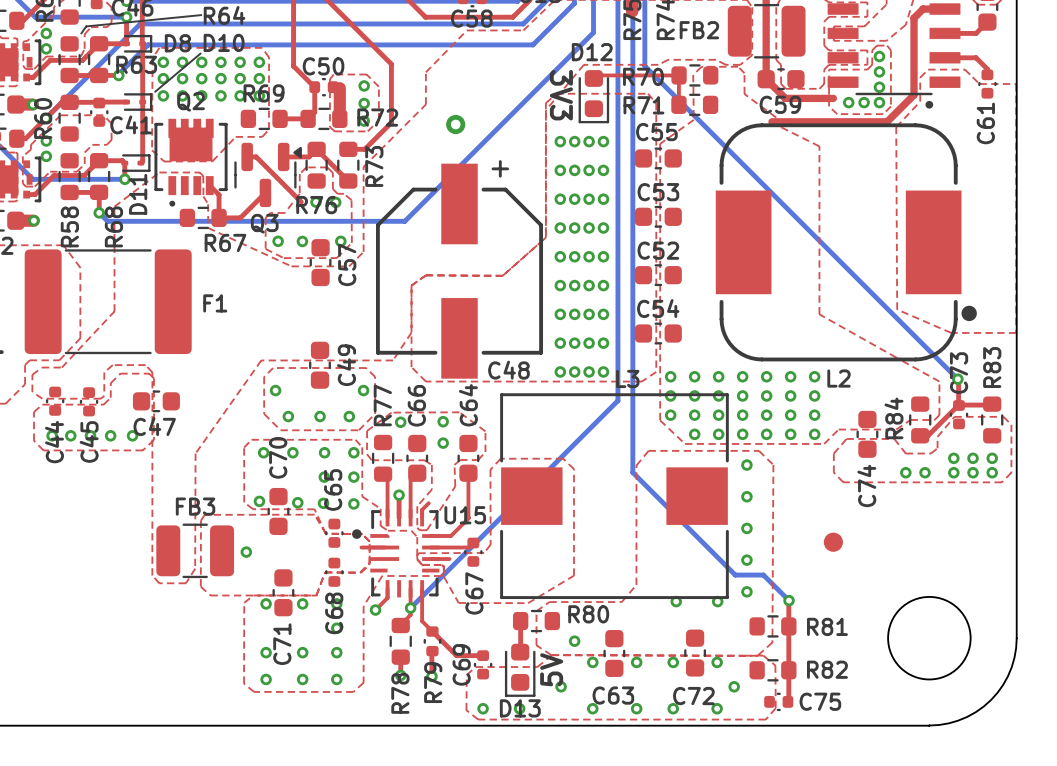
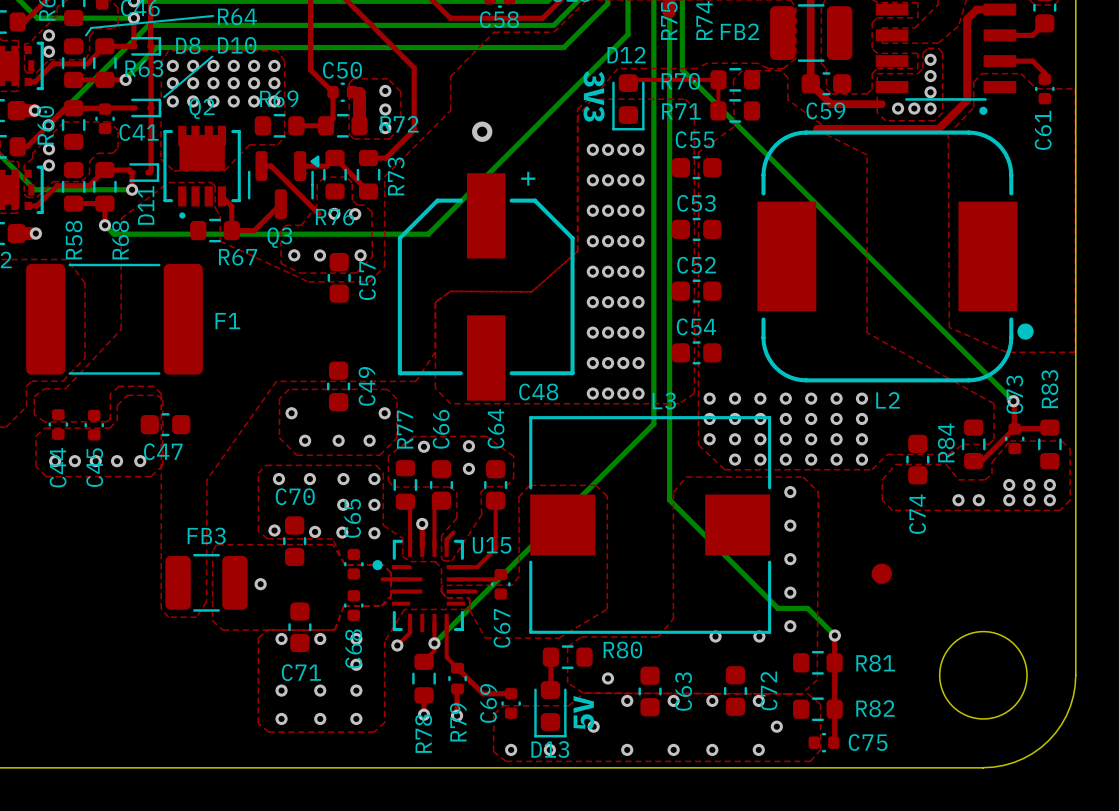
C70 name rotation: 0° (278, 457) -> 90° clockwise (295, 496)
C71 name rotation: 0° (282, 644) -> 90° clockwise (301, 672)
C63 name rotation: 0° (613, 695) -> 90° counterclockwise (683, 691)
C63 name position: C63 (613, 695) -> C63 (683, 691)
C72 name rotation: 0° (693, 696) -> 90° counterclockwise (768, 690)
C72 name position: C72 (693, 696) -> C72 (768, 690)

